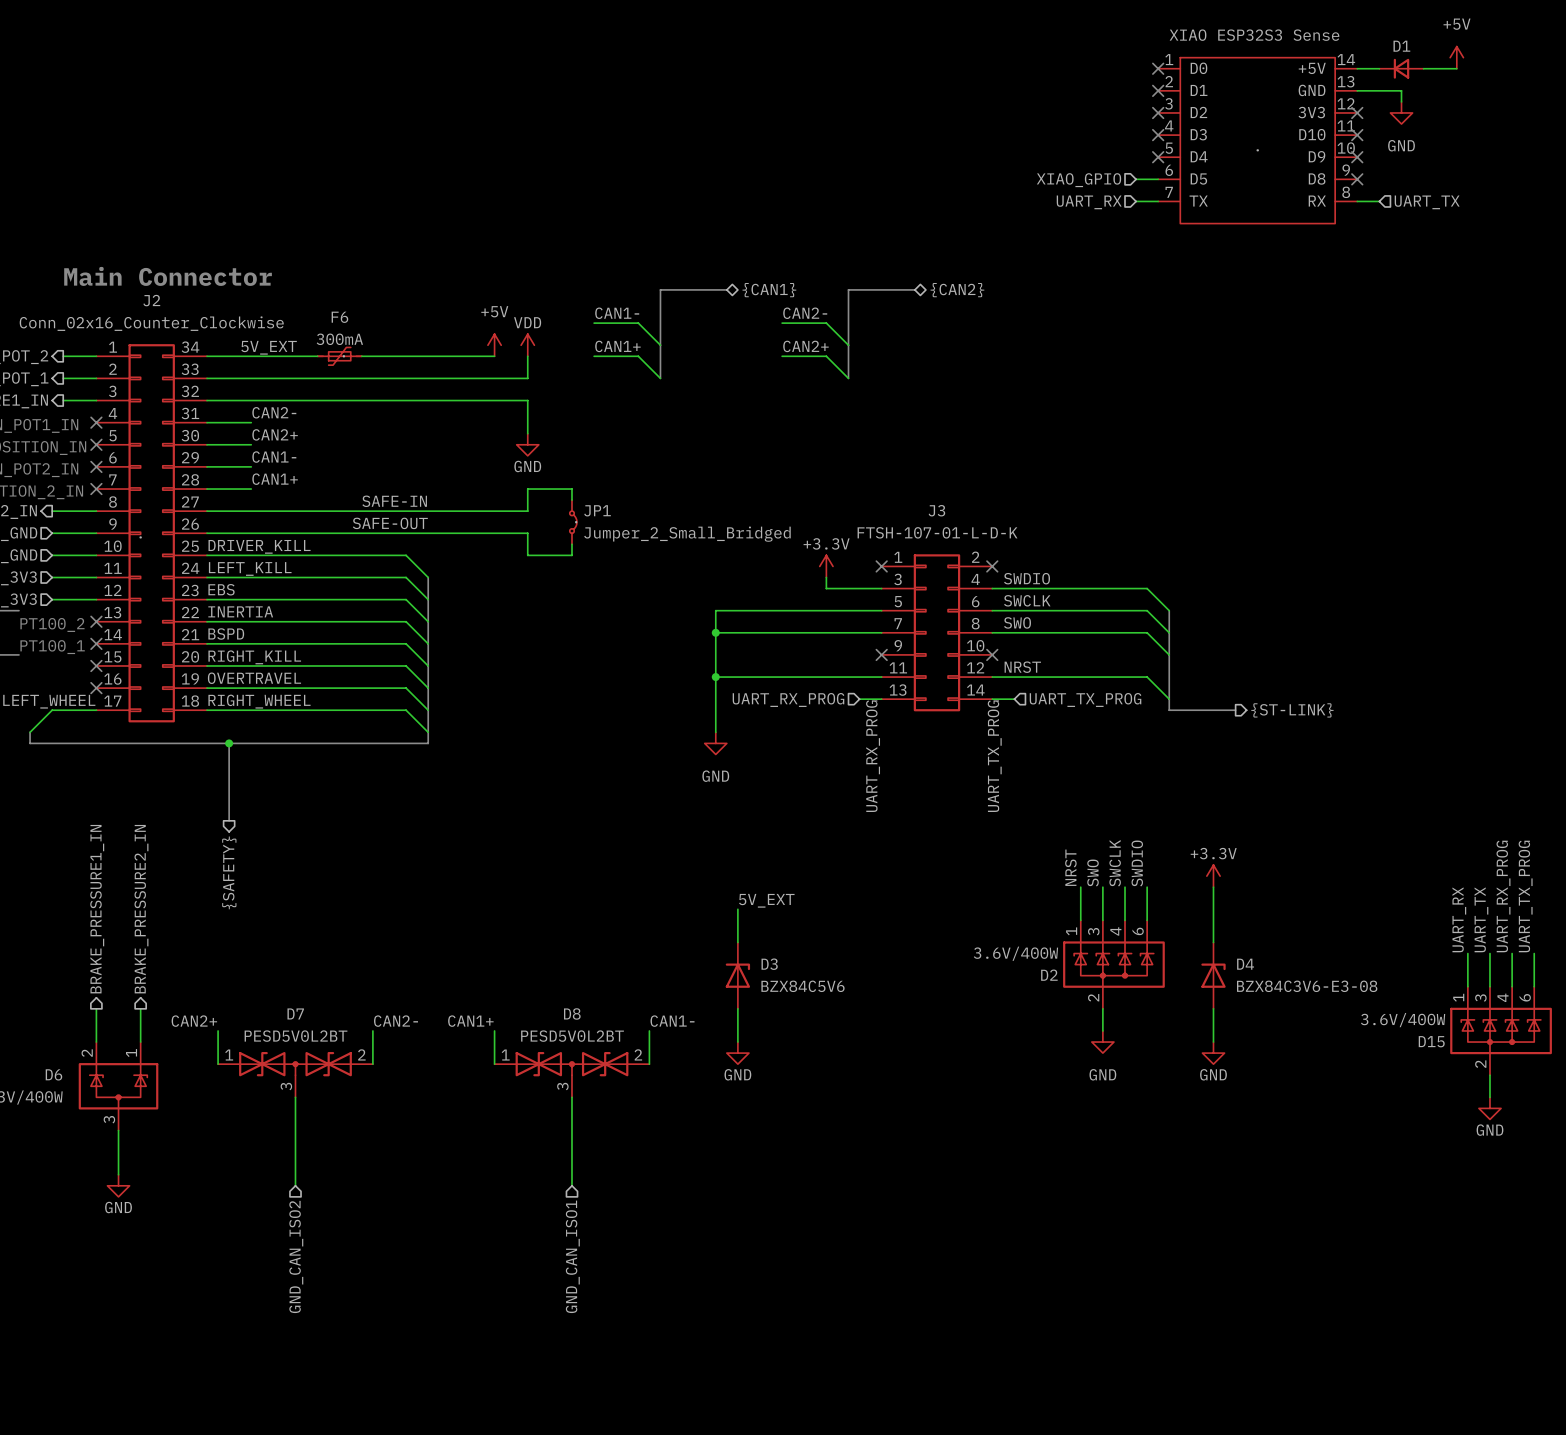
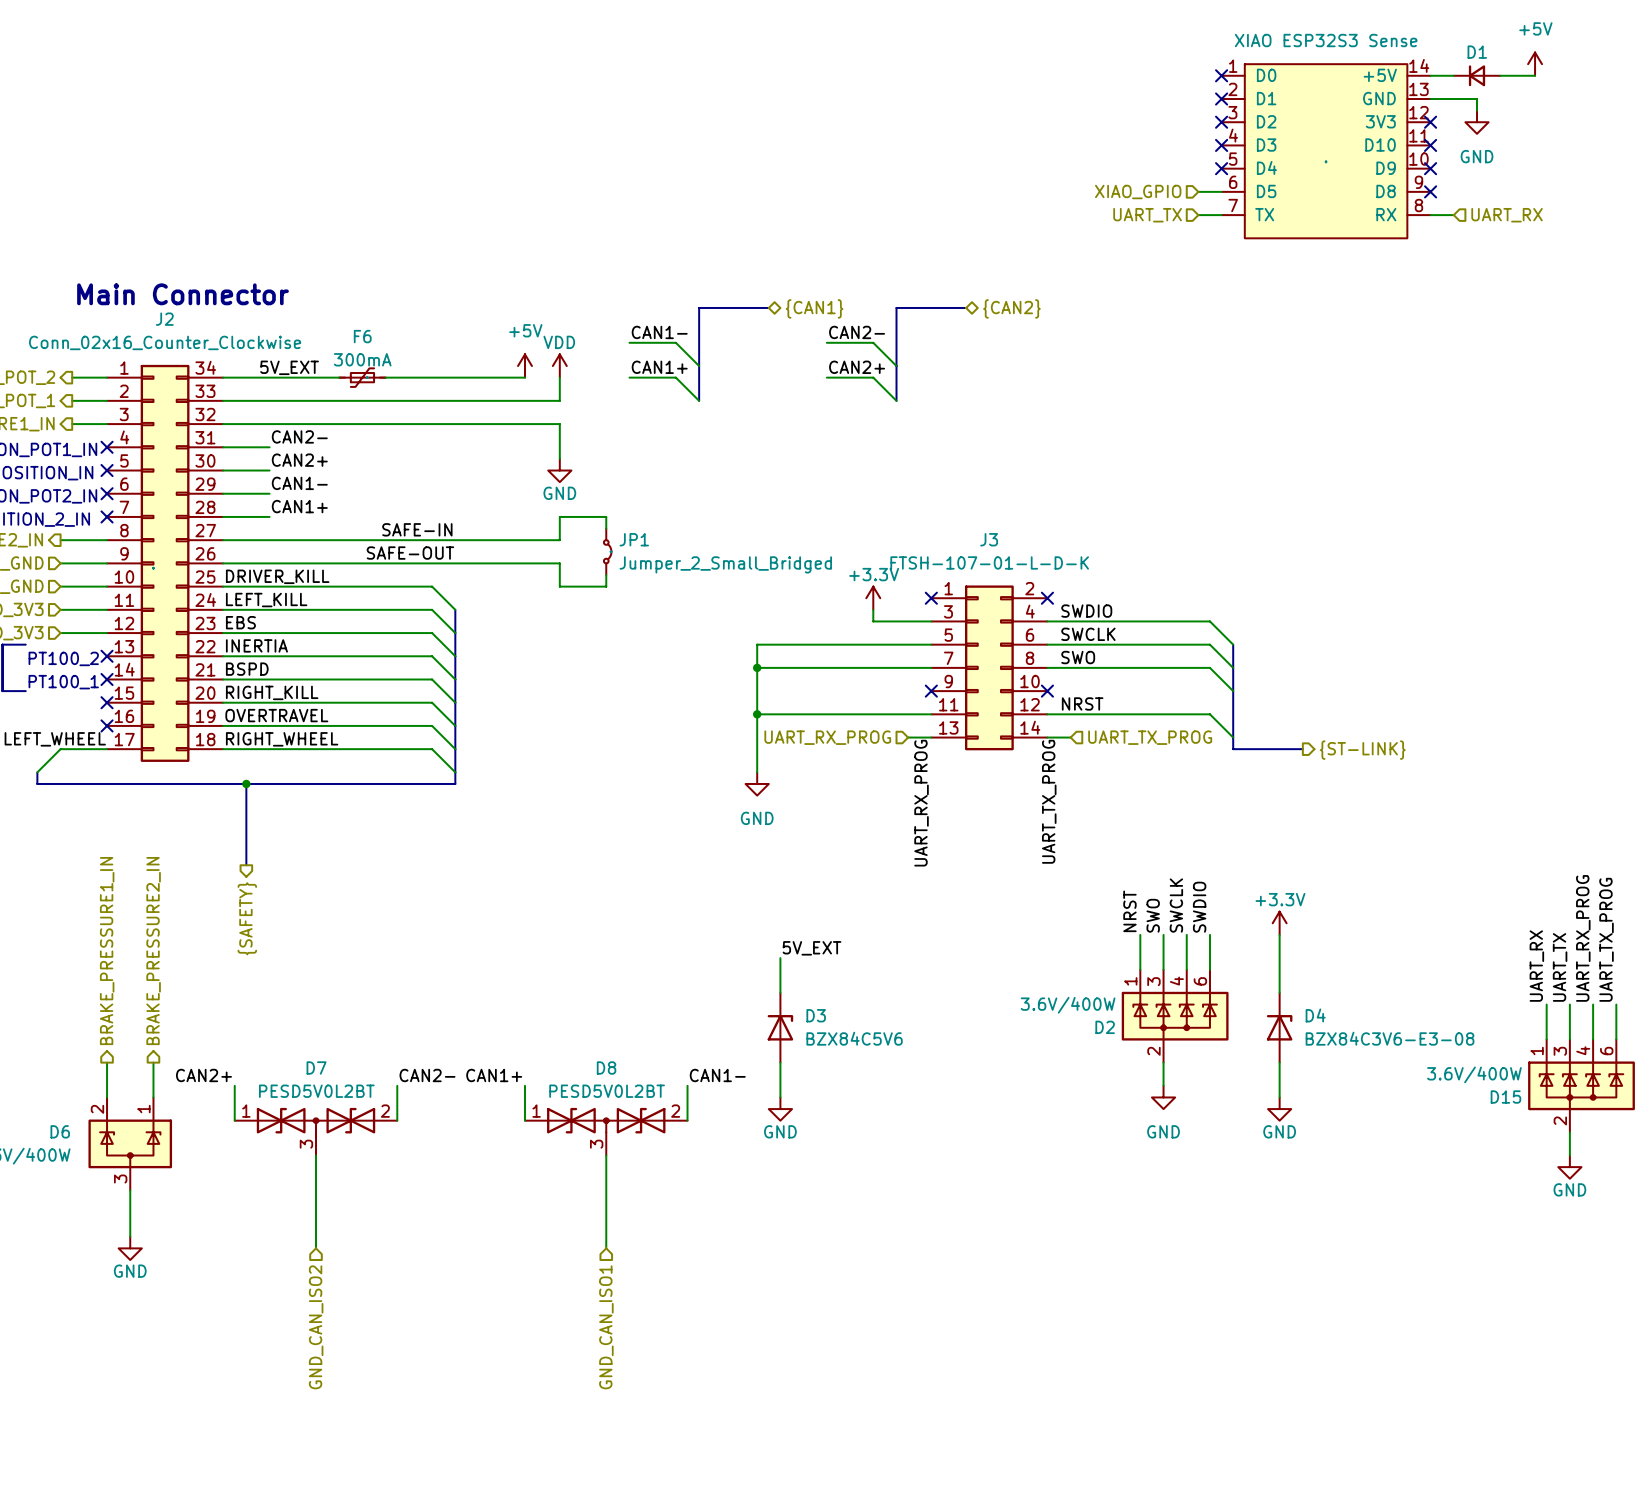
hierarchical label: UART_RX (1089, 202) -> UART_TX (1147, 215)
hierarchical label: UART_TX (1427, 202) -> UART_RX (1507, 215)

